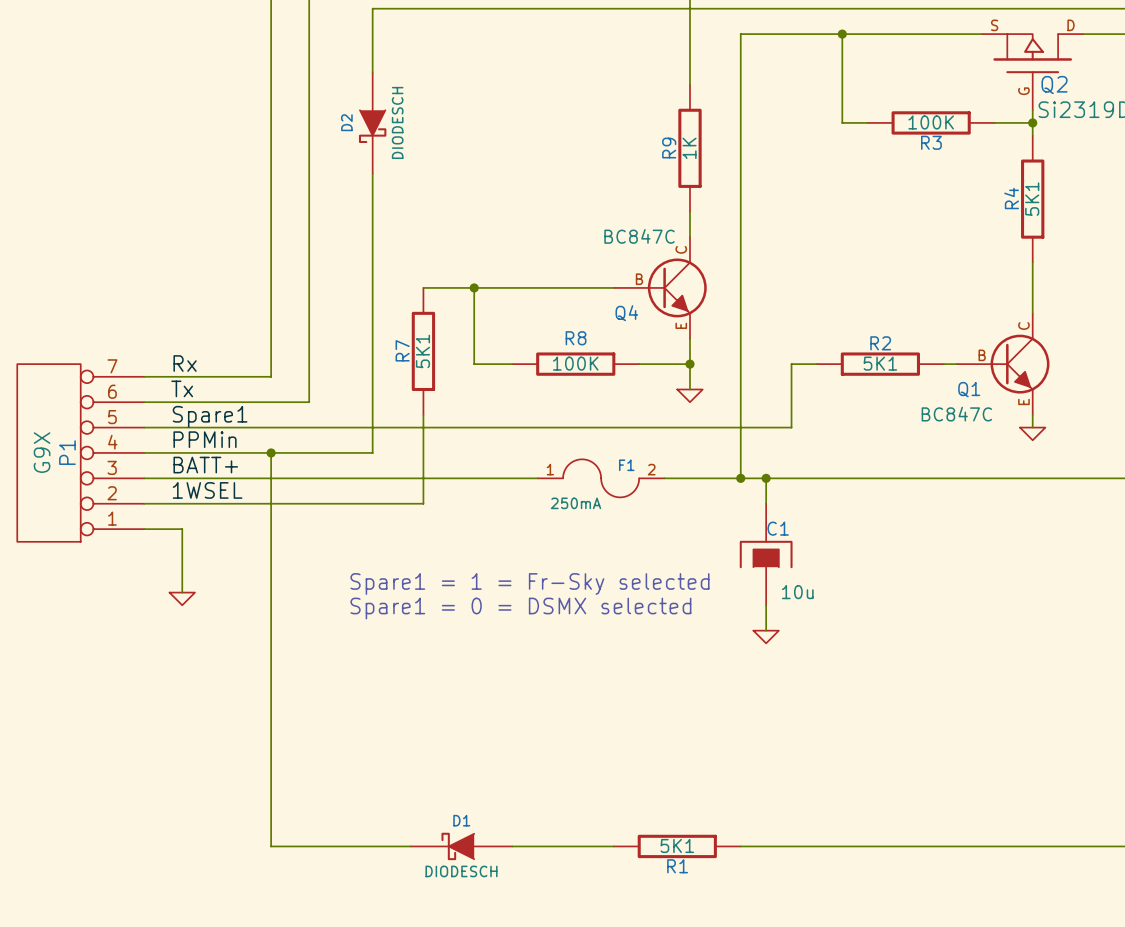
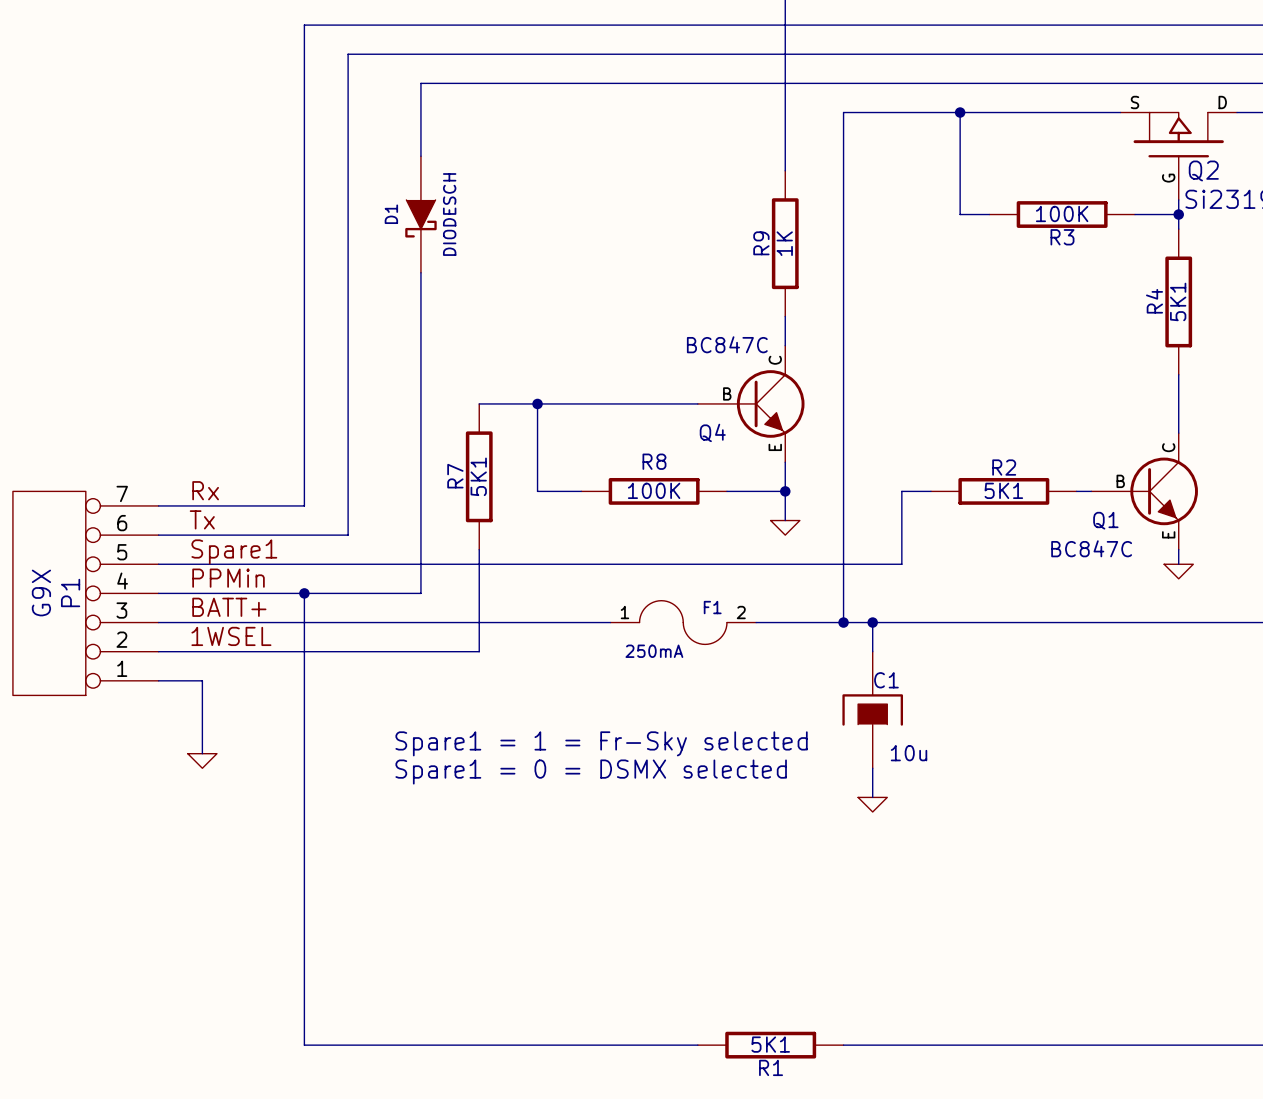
D2 name: D2 (346, 122) -> D1 (391, 214)
D1: DIODESCH (461, 846) -> none

